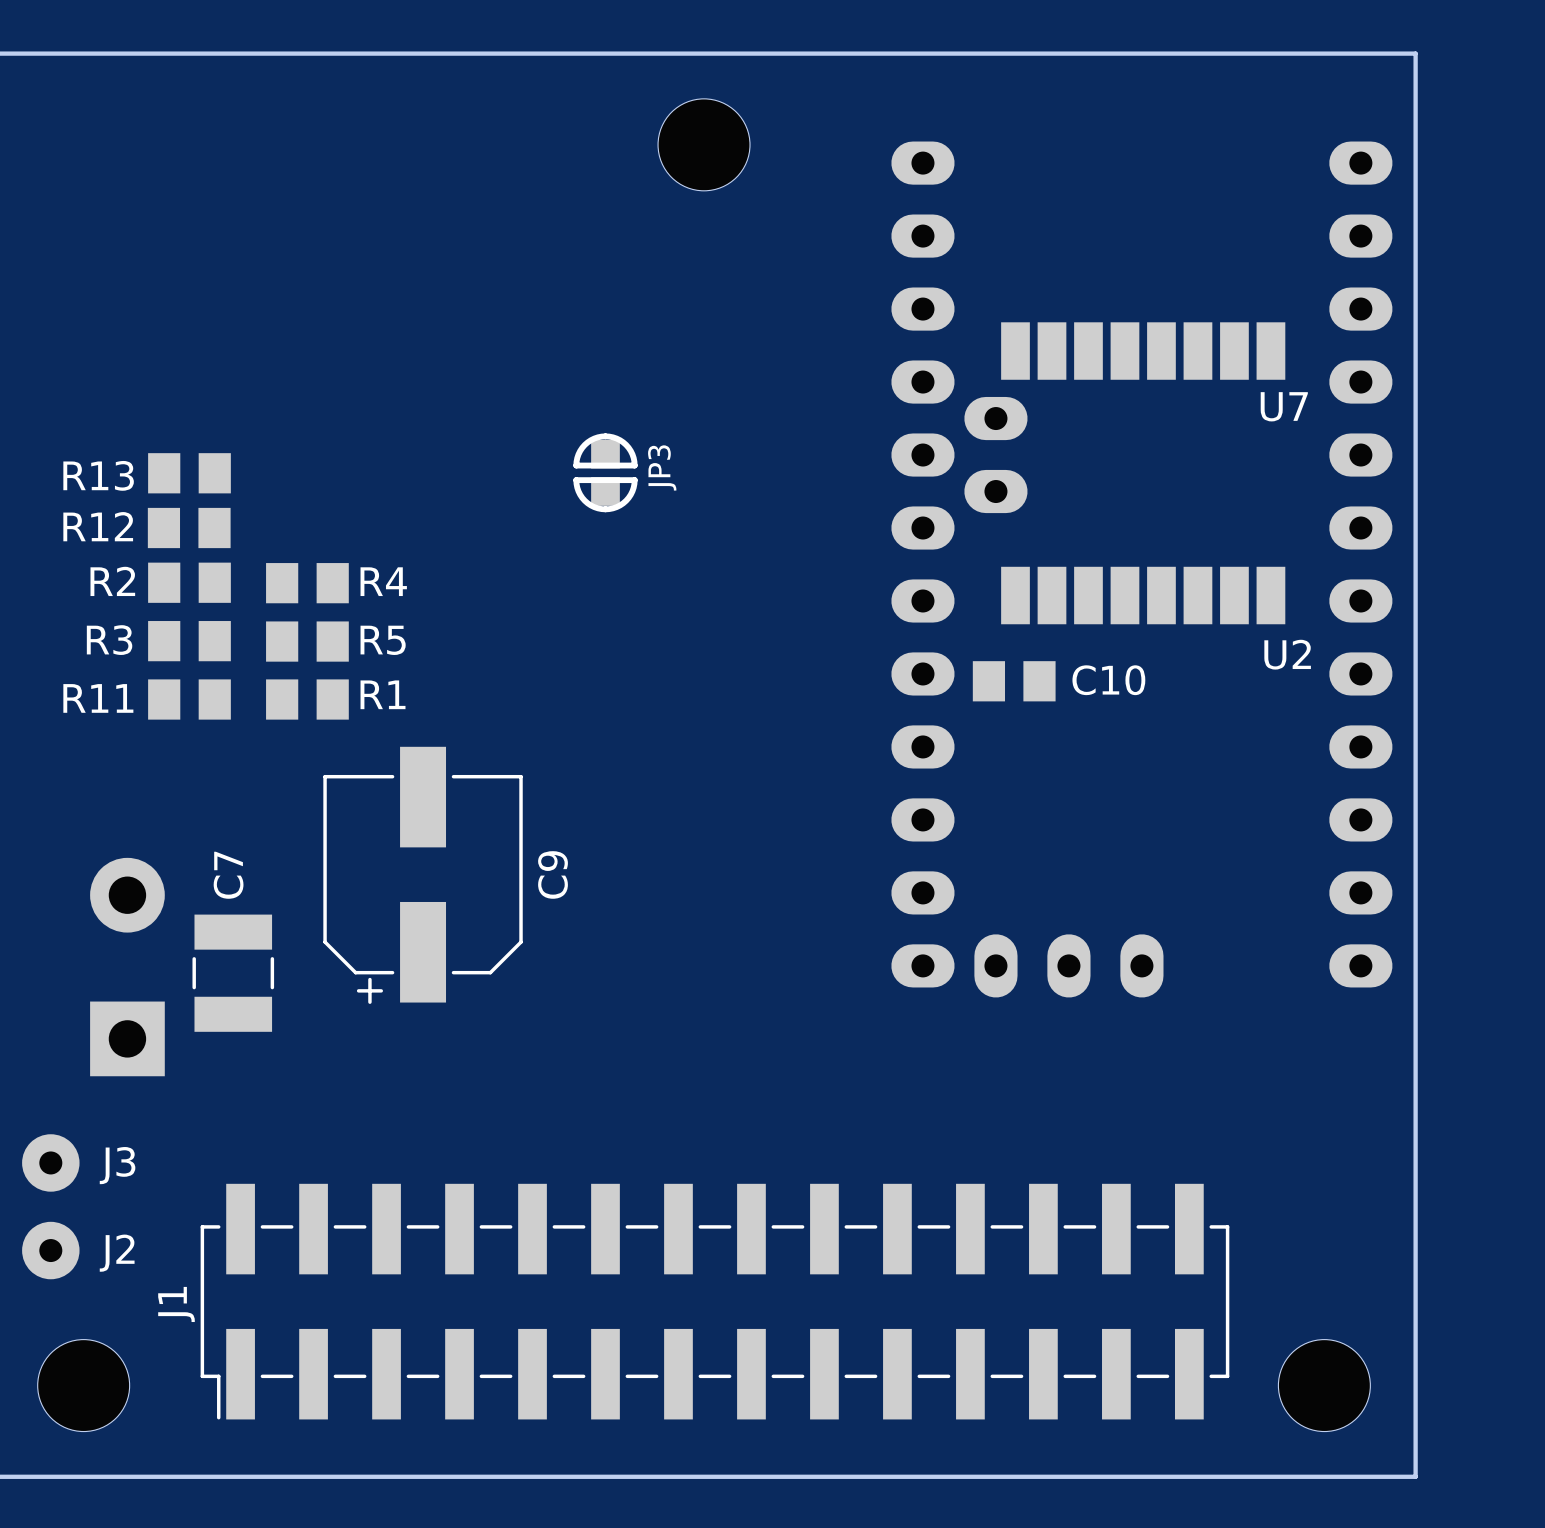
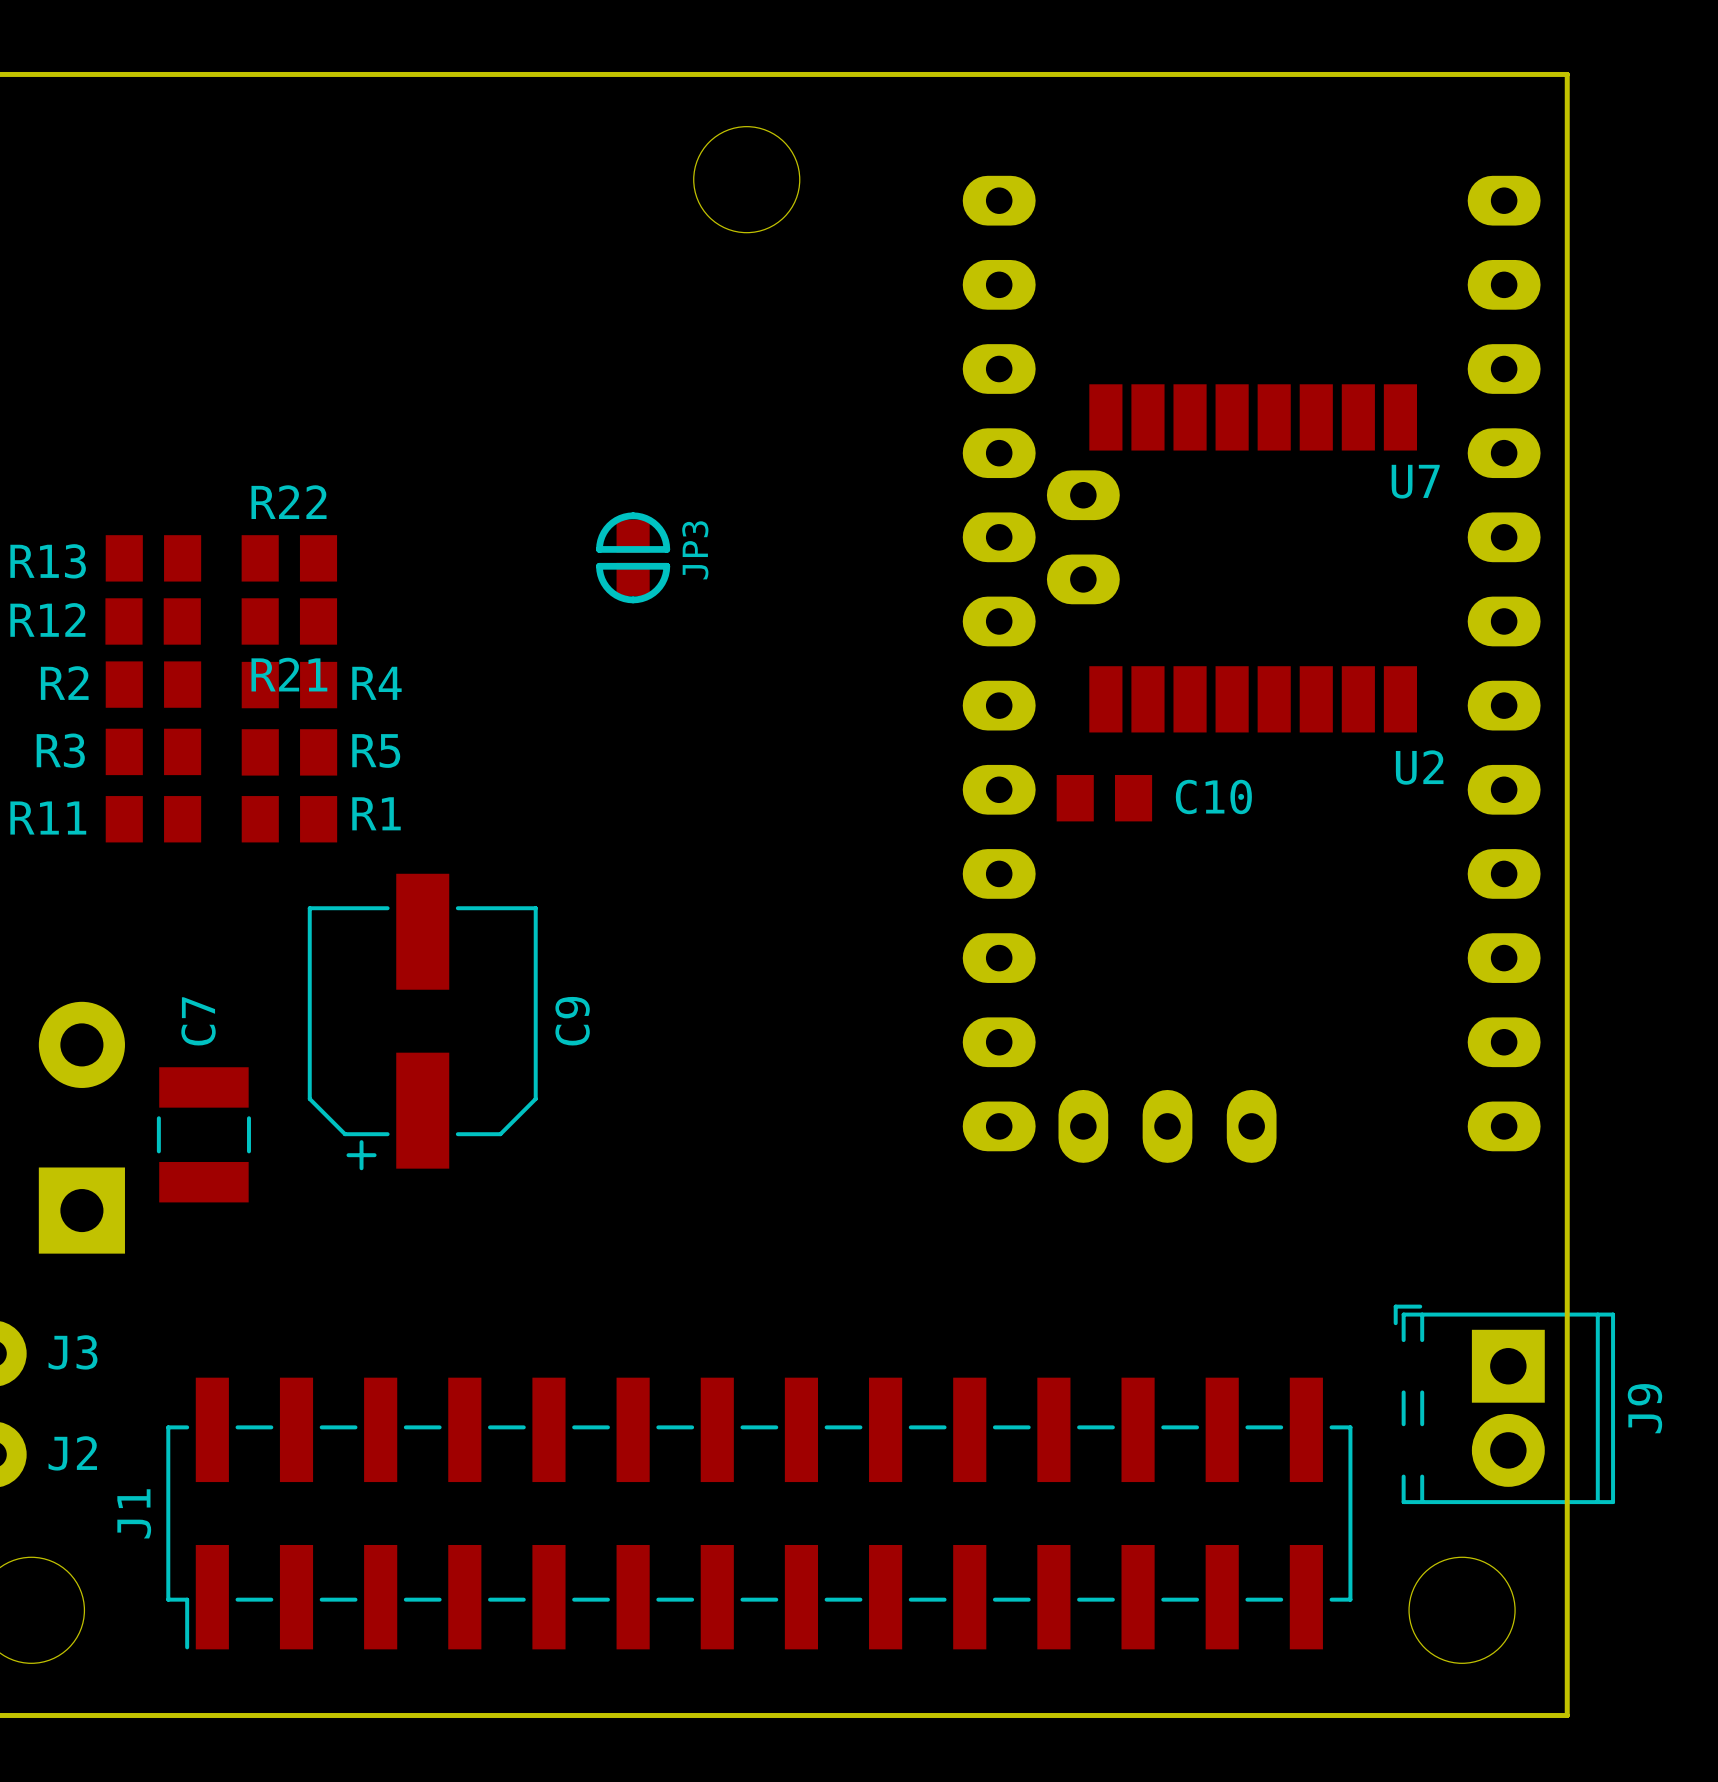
R22: none -> (289, 558)
R21: none -> (289, 621)
J9: none -> (1504, 1404)

